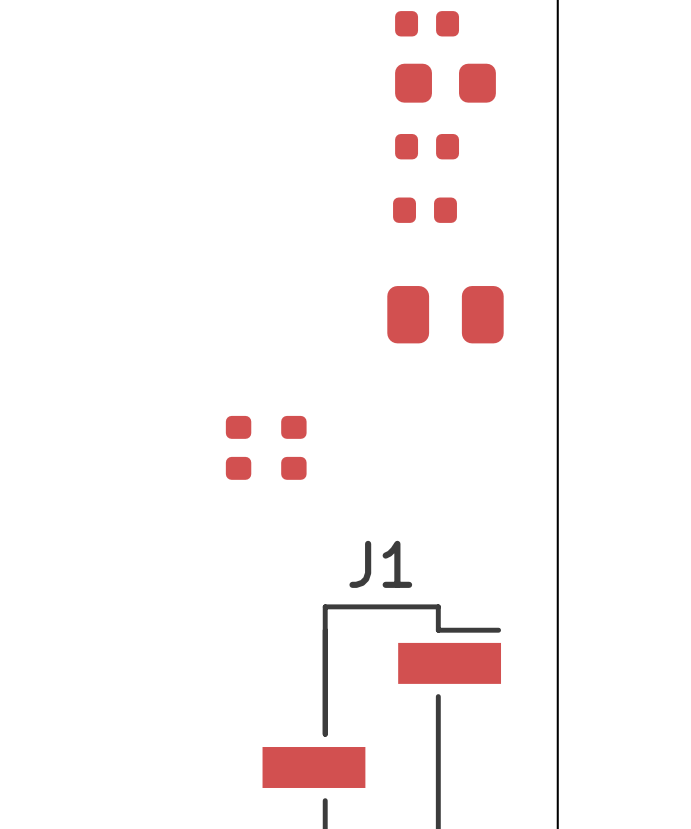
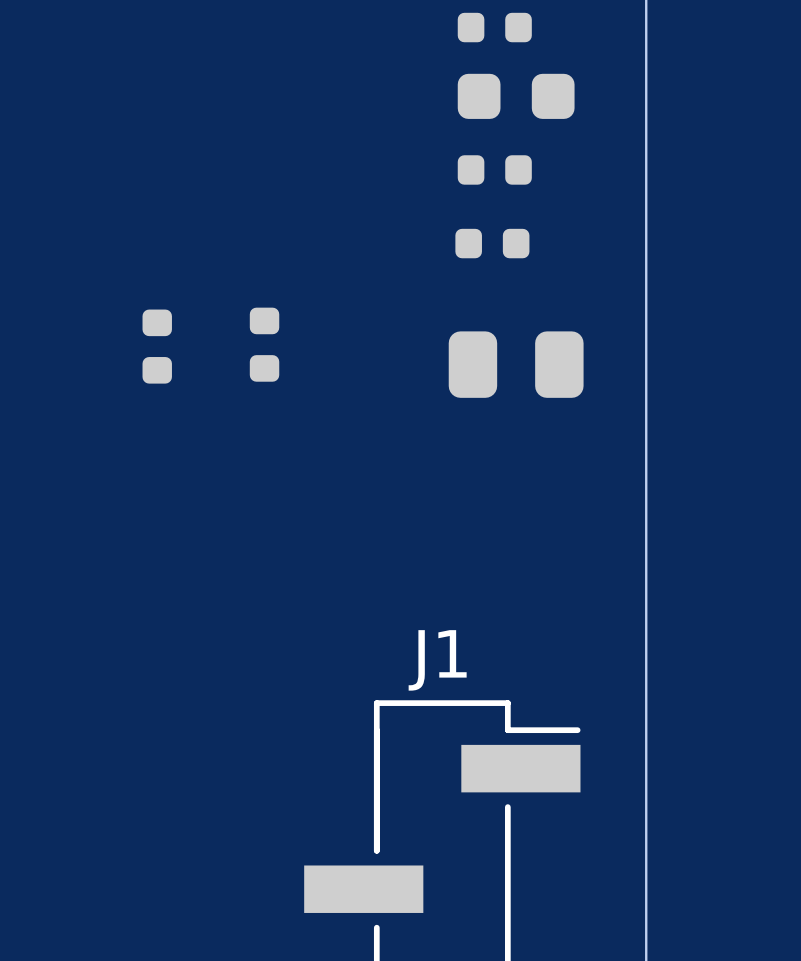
part: none -> (264, 344)
part: none -> (157, 346)
part: (238, 447) -> none
part: (293, 447) -> none

